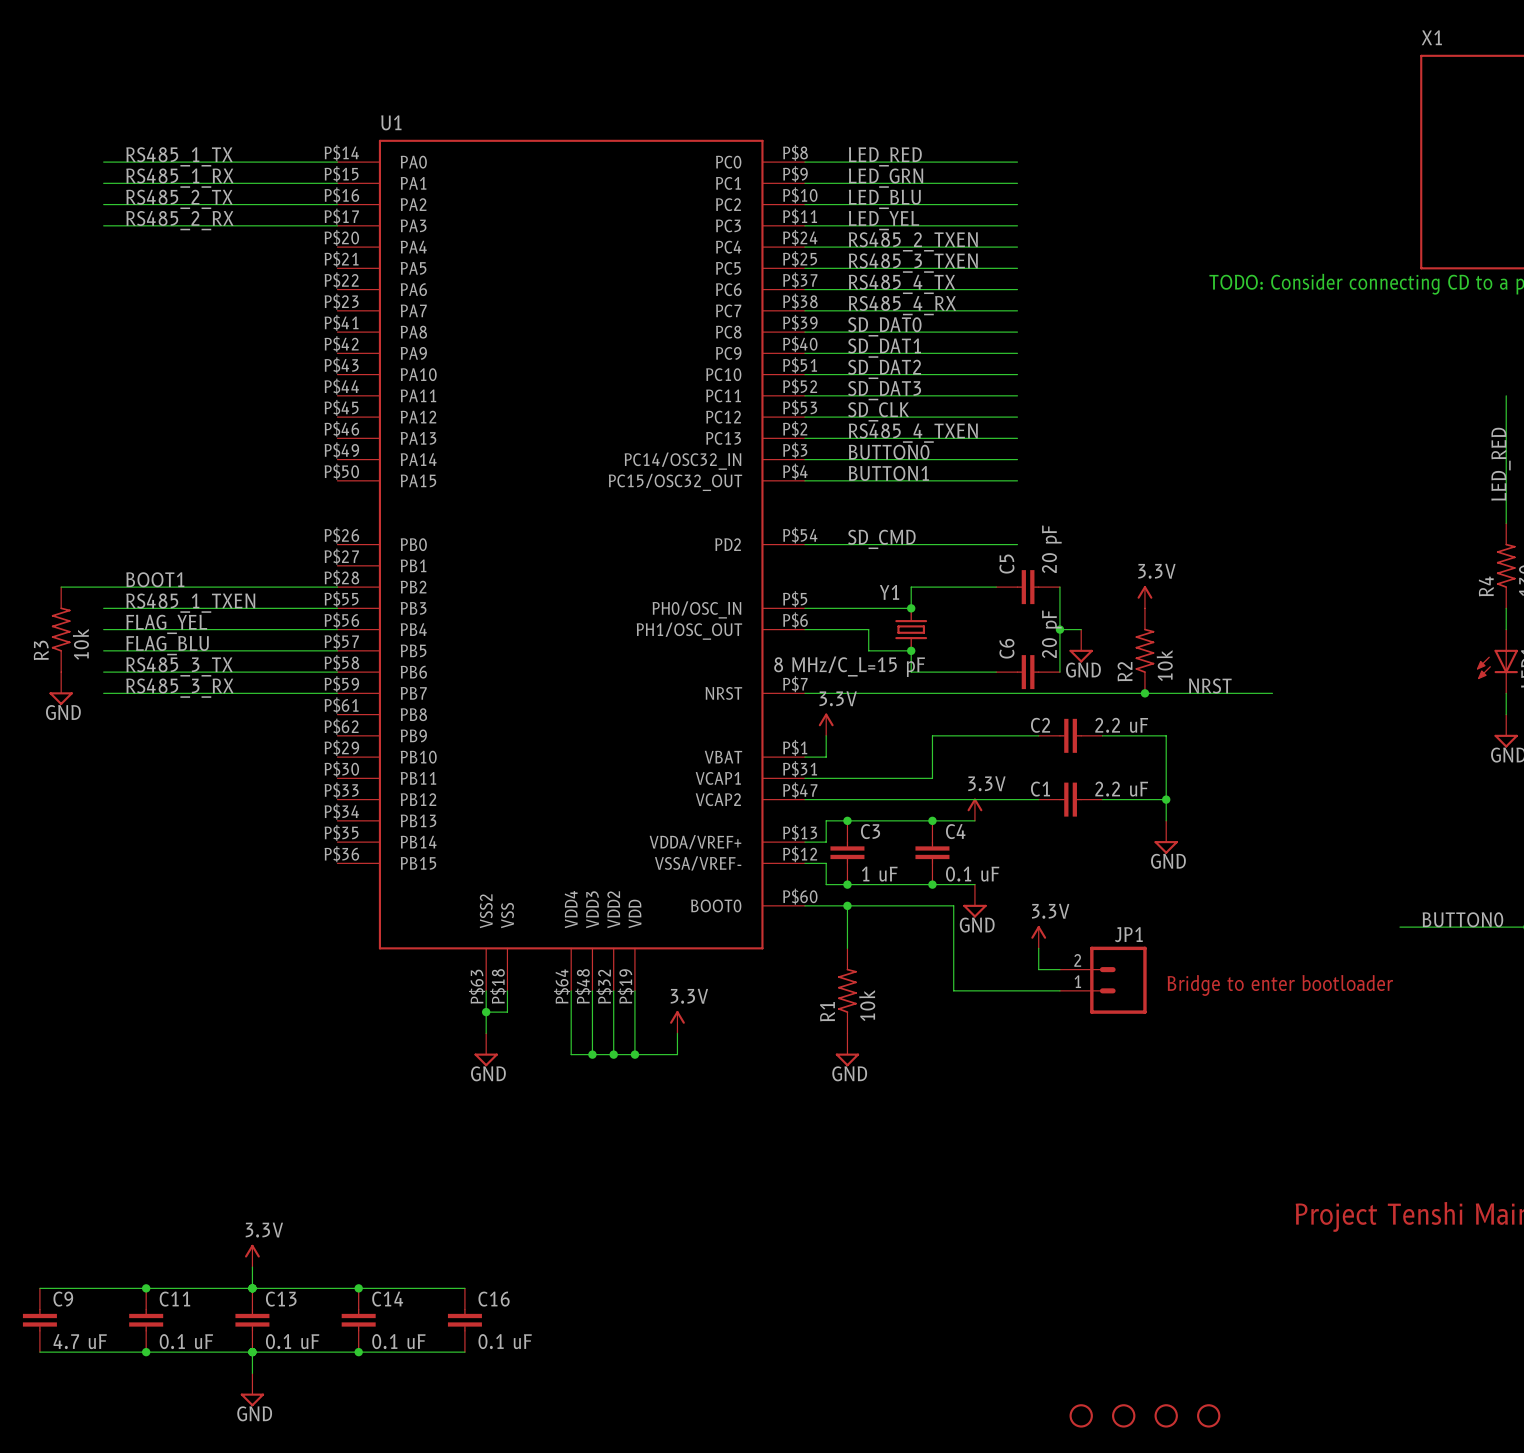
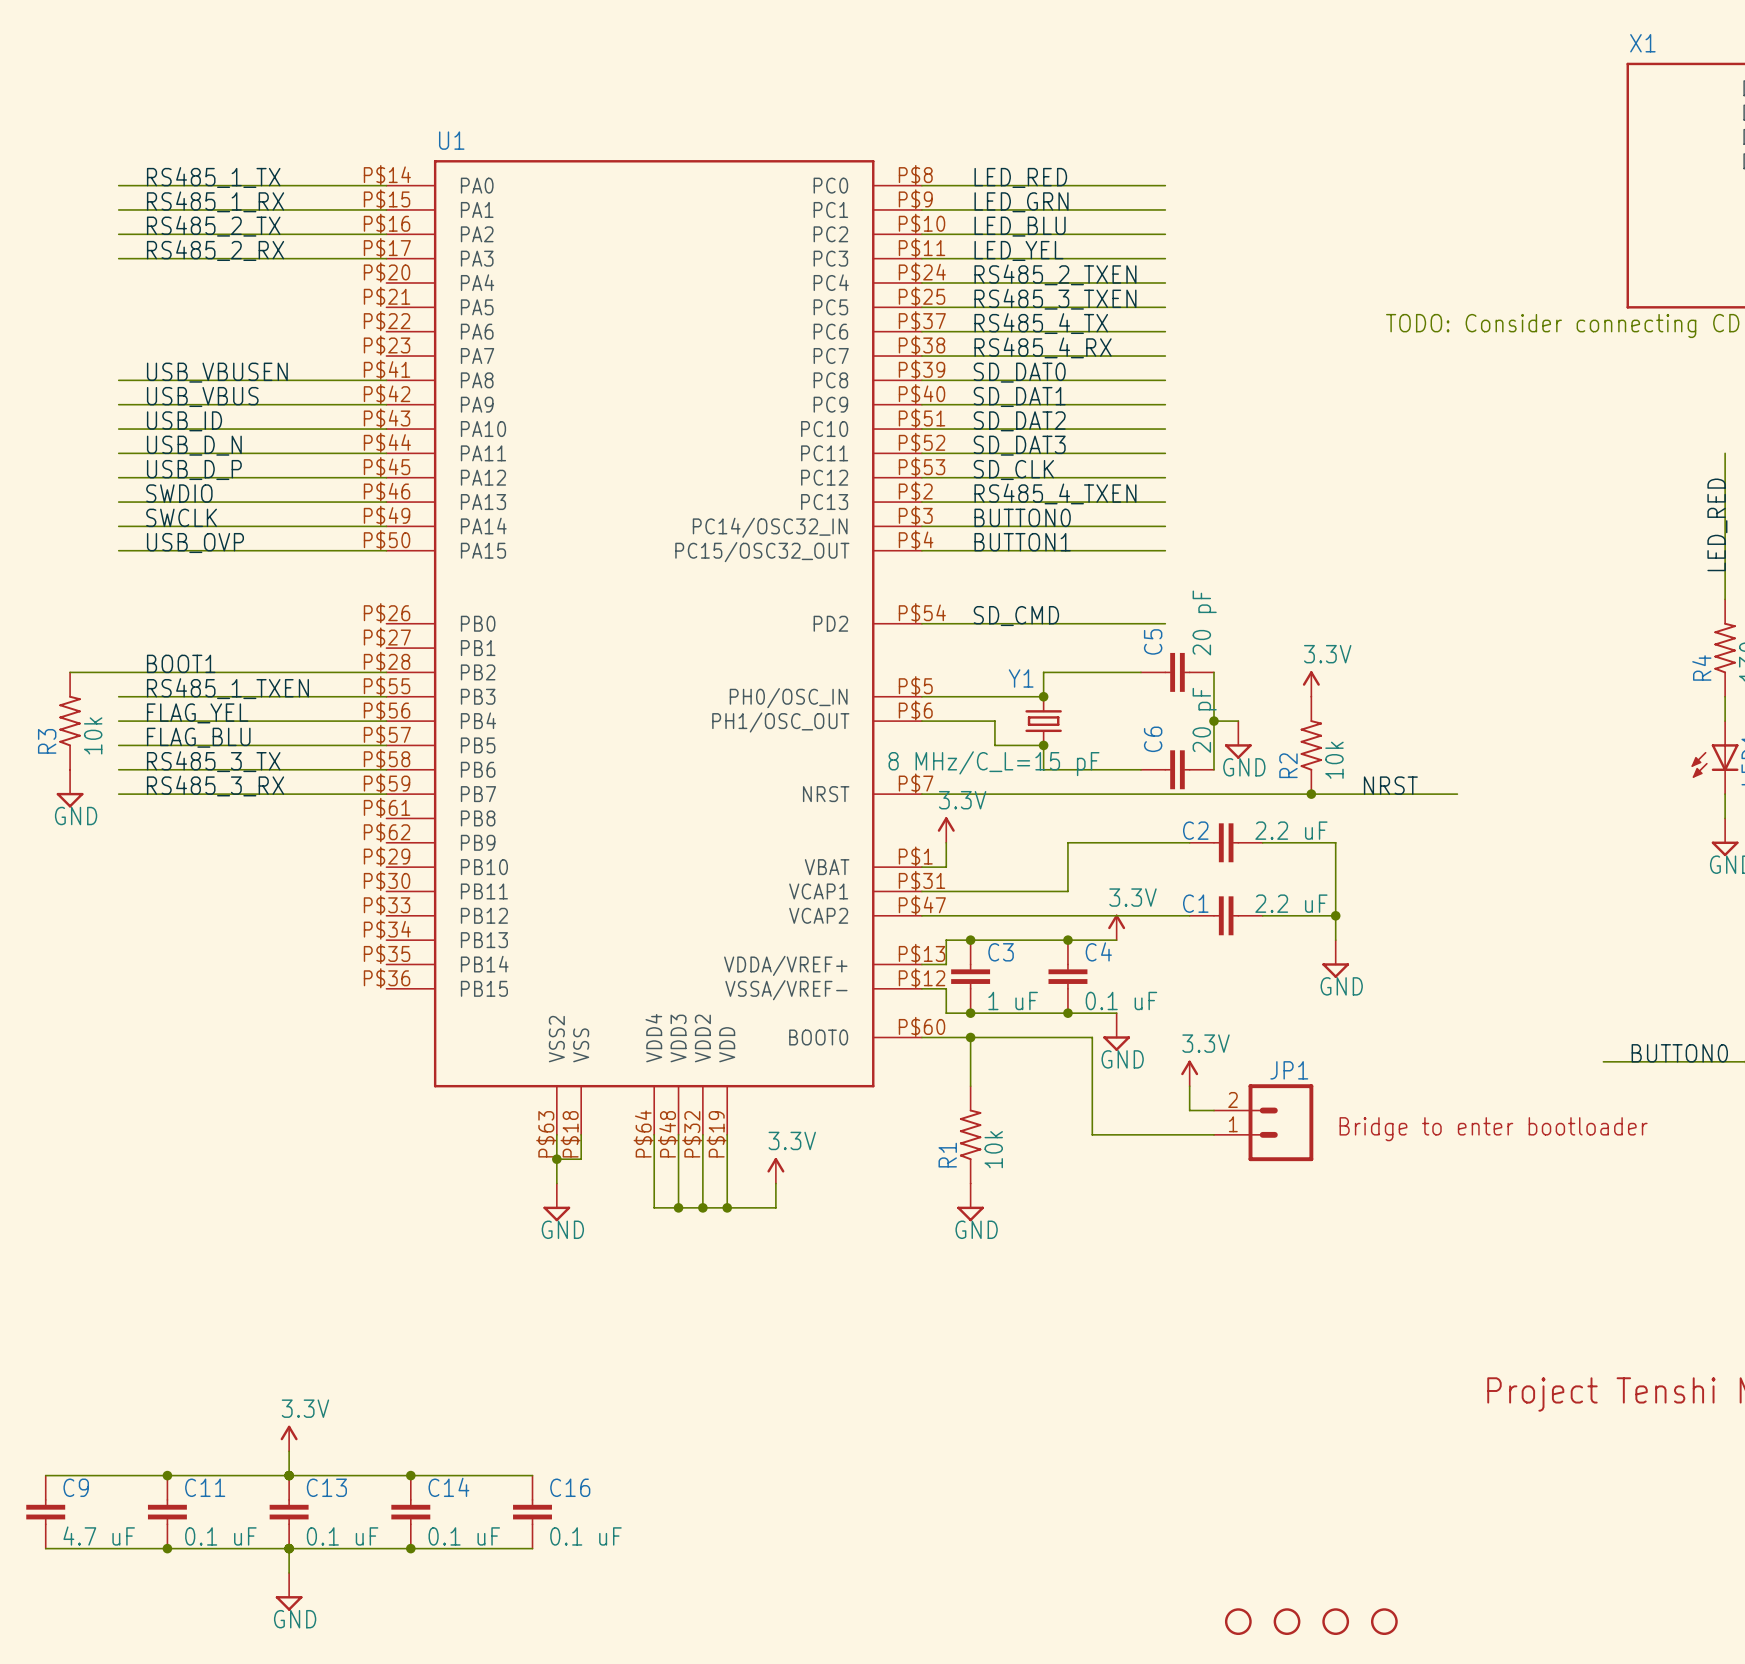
label: none -> USB_VBUSEN (217, 372)
wire: none -> (118, 380) (386, 380)
label: none -> USB_VBUS (202, 396)
wire: none -> (118, 404) (386, 404)
label: none -> USB_ID (184, 421)
wire: none -> (118, 429) (386, 429)
label: none -> USB_D_N (194, 445)
wire: none -> (118, 453) (386, 453)
label: none -> USB_D_P (194, 469)
wire: none -> (118, 477) (386, 477)
label: none -> SWDIO (179, 493)
wire: none -> (118, 502) (386, 502)
label: none -> SWCLK (181, 517)
wire: none -> (118, 526) (386, 526)
label: none -> USB_OVP (195, 543)
wire: none -> (118, 550) (386, 550)

